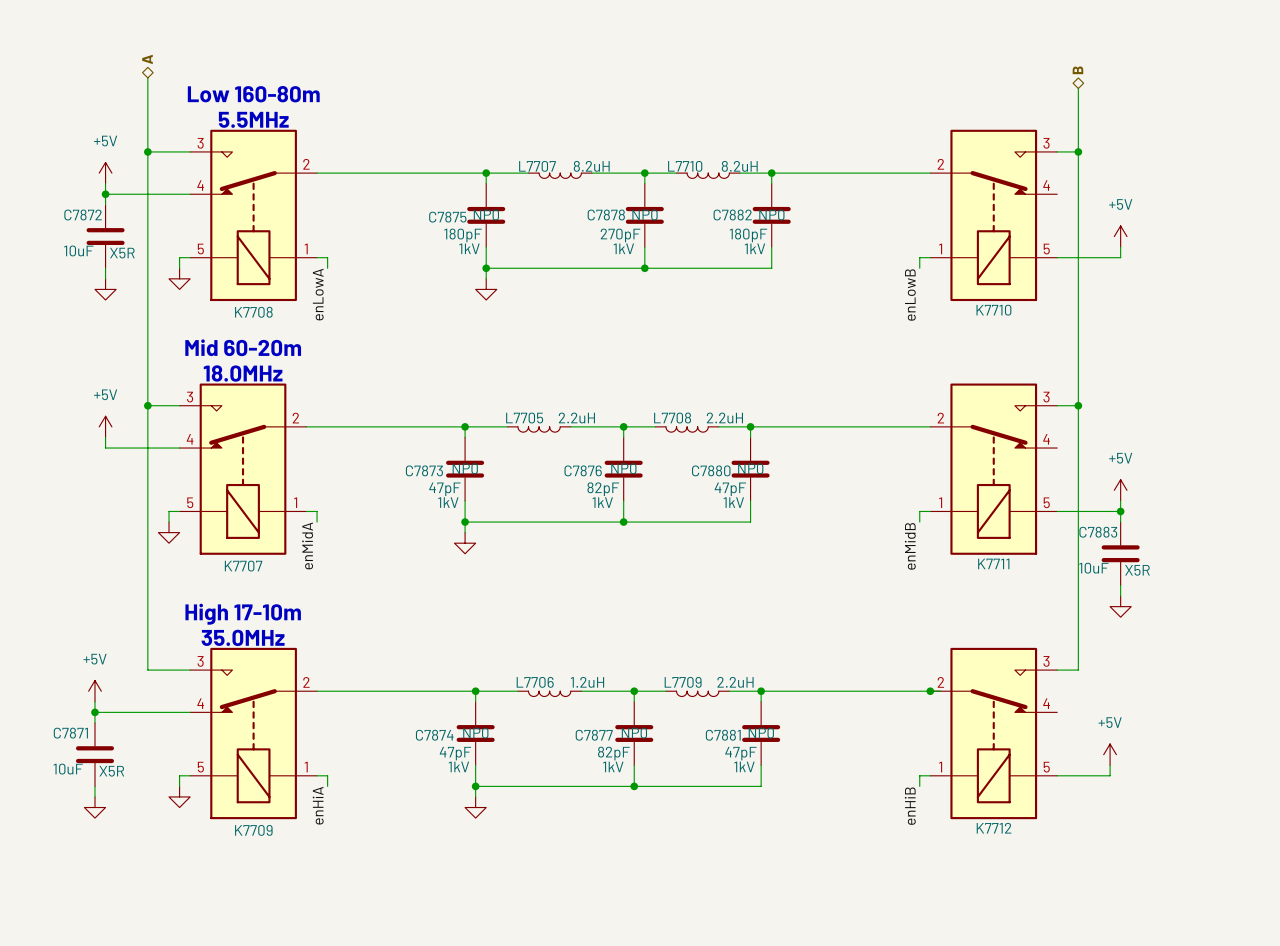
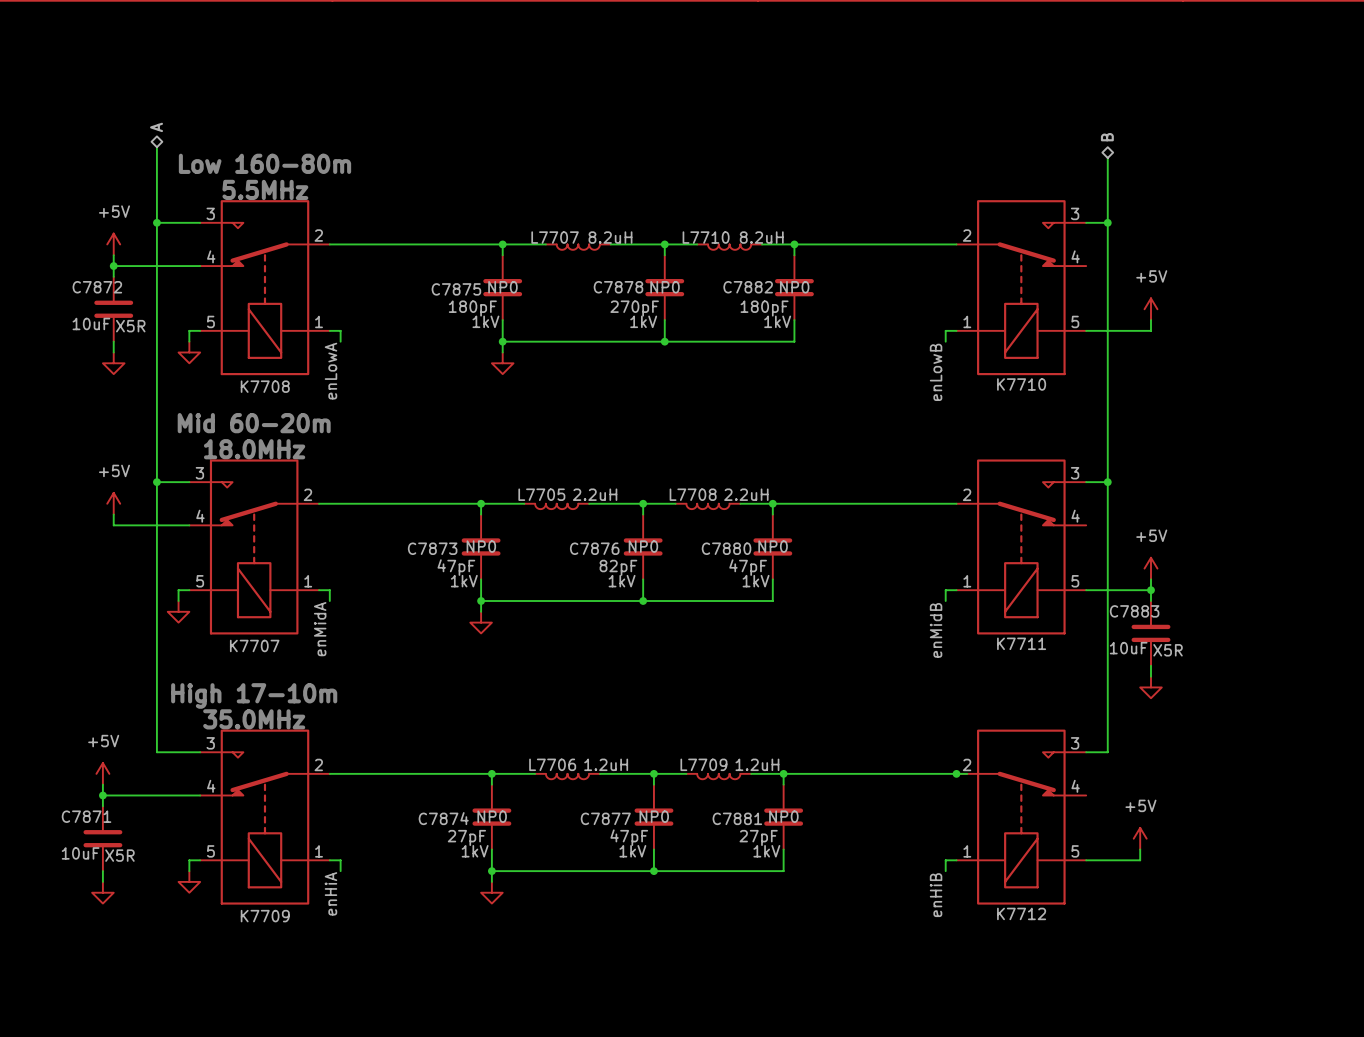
L7709 value: 2.2uH (735, 682) -> 1.2uH (757, 764)
C7874 value: 47pF (455, 753) -> 27pF (466, 837)
C7877 value: 82pF (613, 753) -> 47pF (629, 837)
C7881 value: 47pF (740, 753) -> 27pF (758, 837)

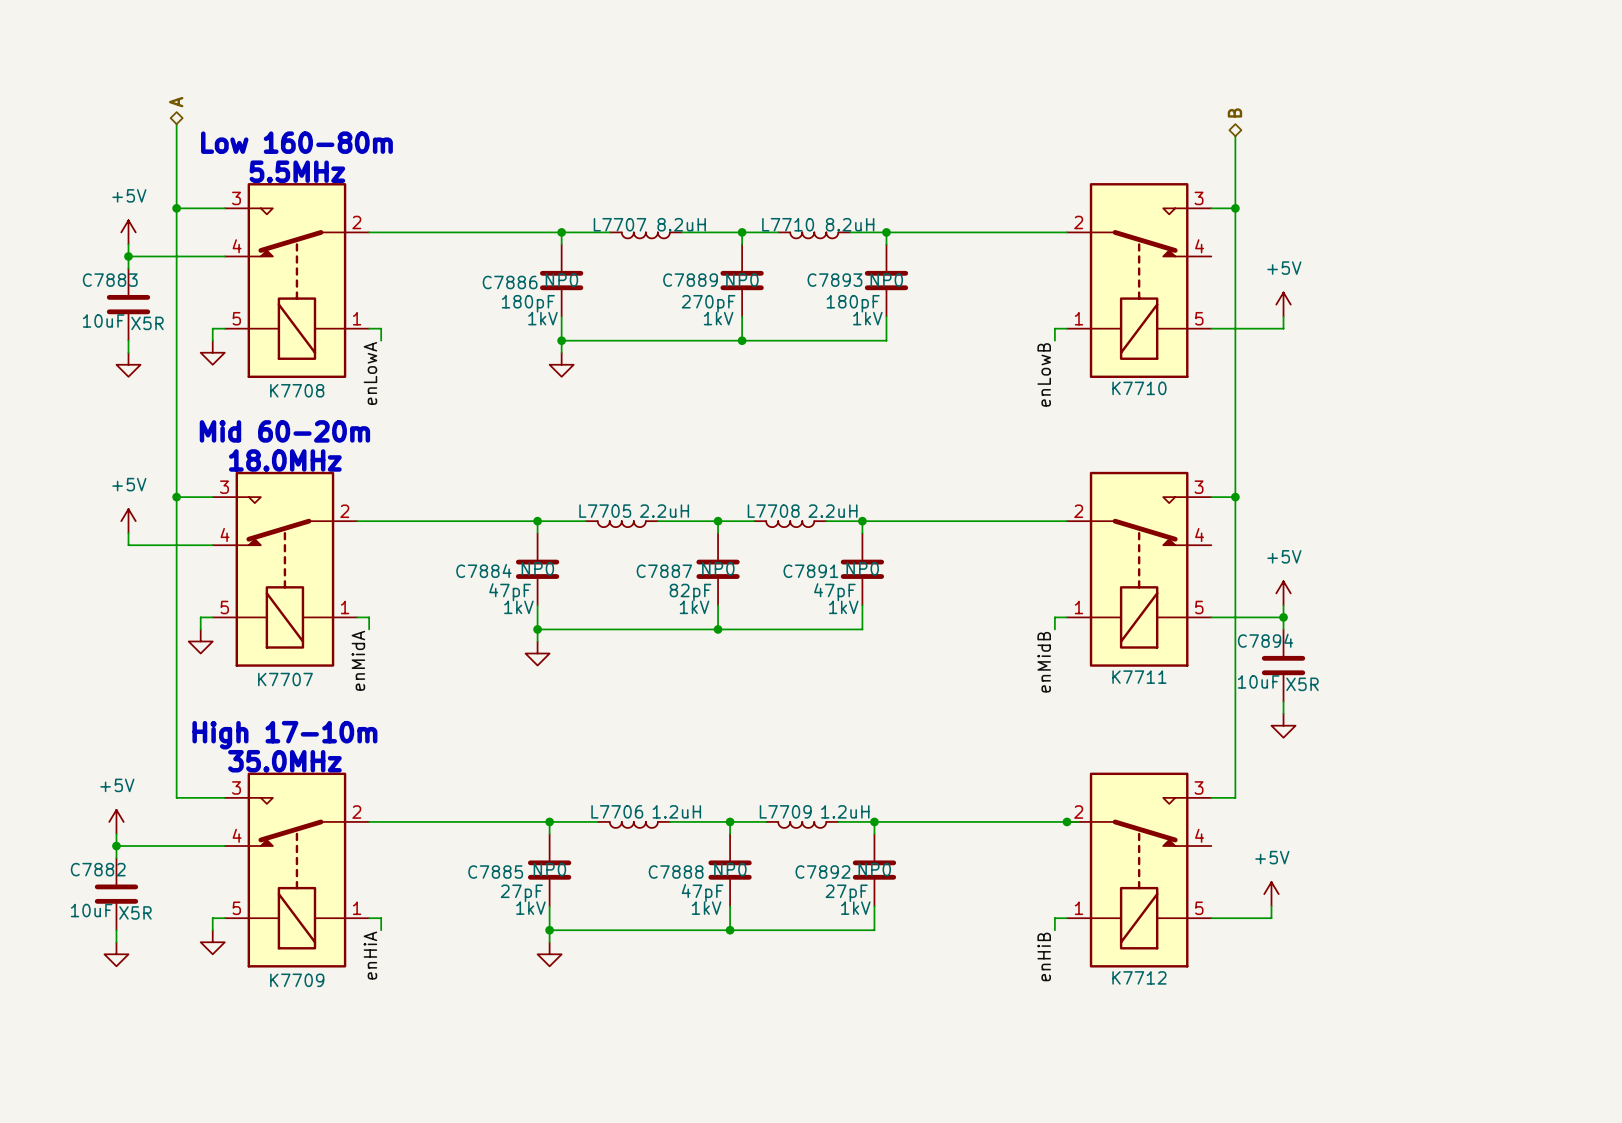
C7872 name: C7872 (97, 287) -> C7883 (110, 280)
C7878 name: C7878 (618, 287) -> C7889 (690, 280)
C7882 name: C7882 (748, 287) -> C7893 (834, 280)
C7875 name: C7875 (456, 289) -> C7886 (510, 282)
C7873 name: C7873 (432, 548) -> C7884 (483, 570)
C7876 name: C7876 (594, 548) -> C7887 (664, 571)
C7880 name: C7880 (726, 548) -> C7891 (810, 571)
C7883 name: C7883 (1134, 611) -> C7894 (1265, 640)
C7871 name: C7871 (86, 816) -> C7882 (98, 869)
C7874 name: C7874 (443, 818) -> C7885 (495, 872)
C7877 name: C7877 (605, 818) -> C7888 (676, 872)
C7881 name: C7881 (737, 818) -> C7892 (822, 872)

